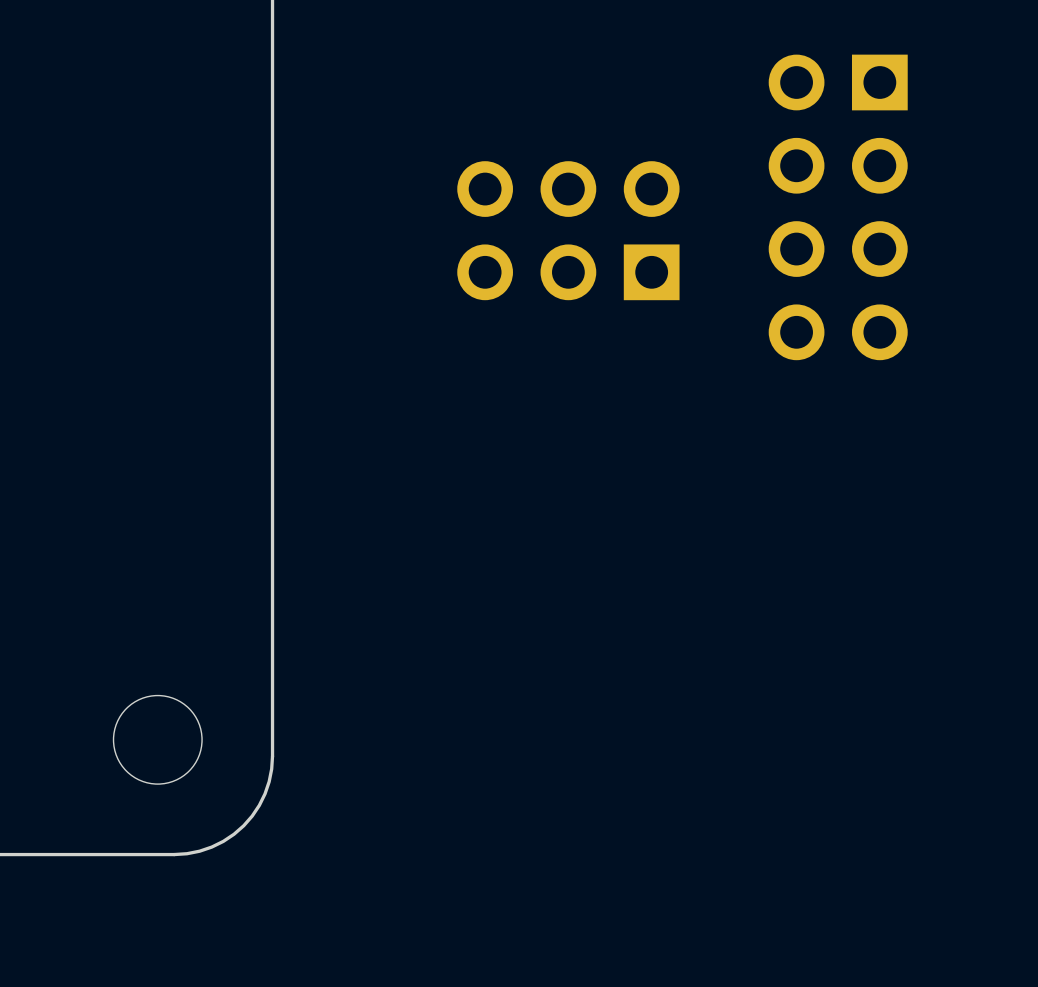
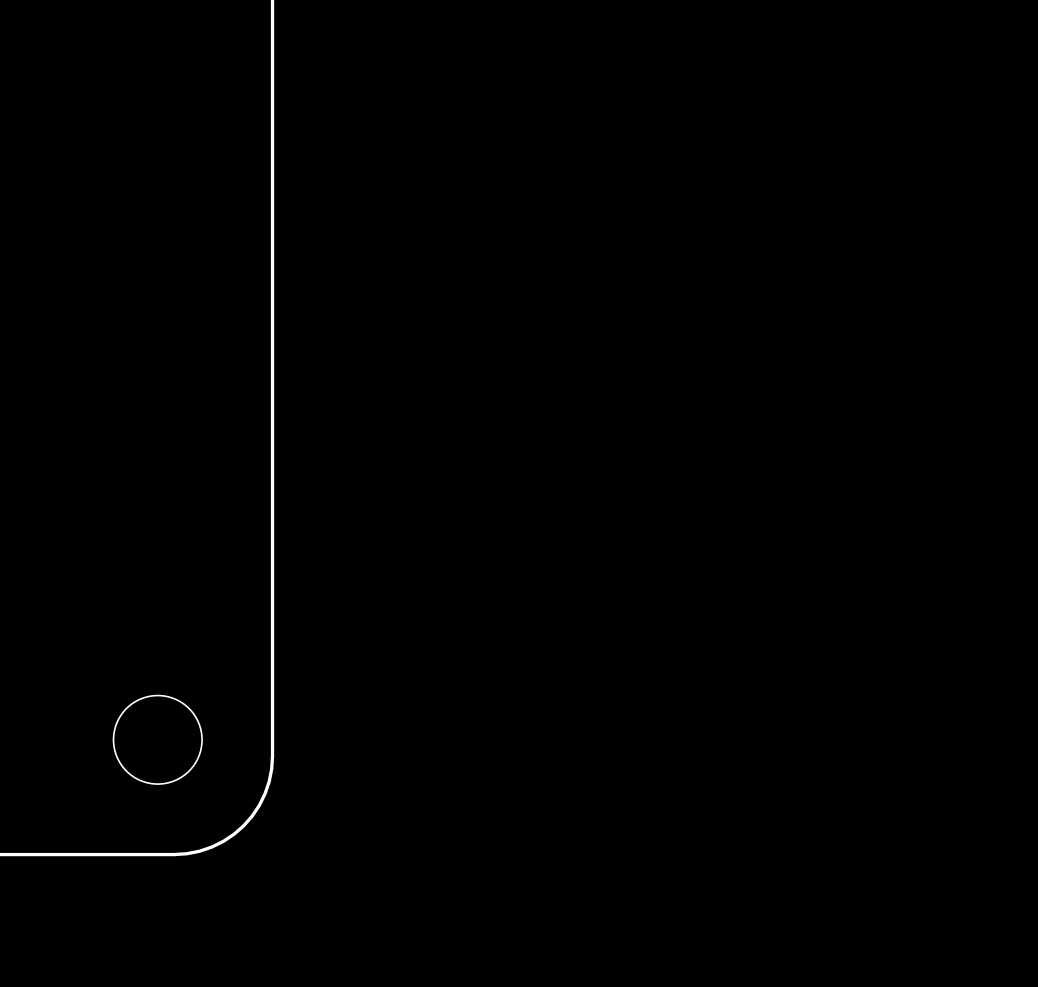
part: (838, 207) -> none
part: (568, 230) -> none

